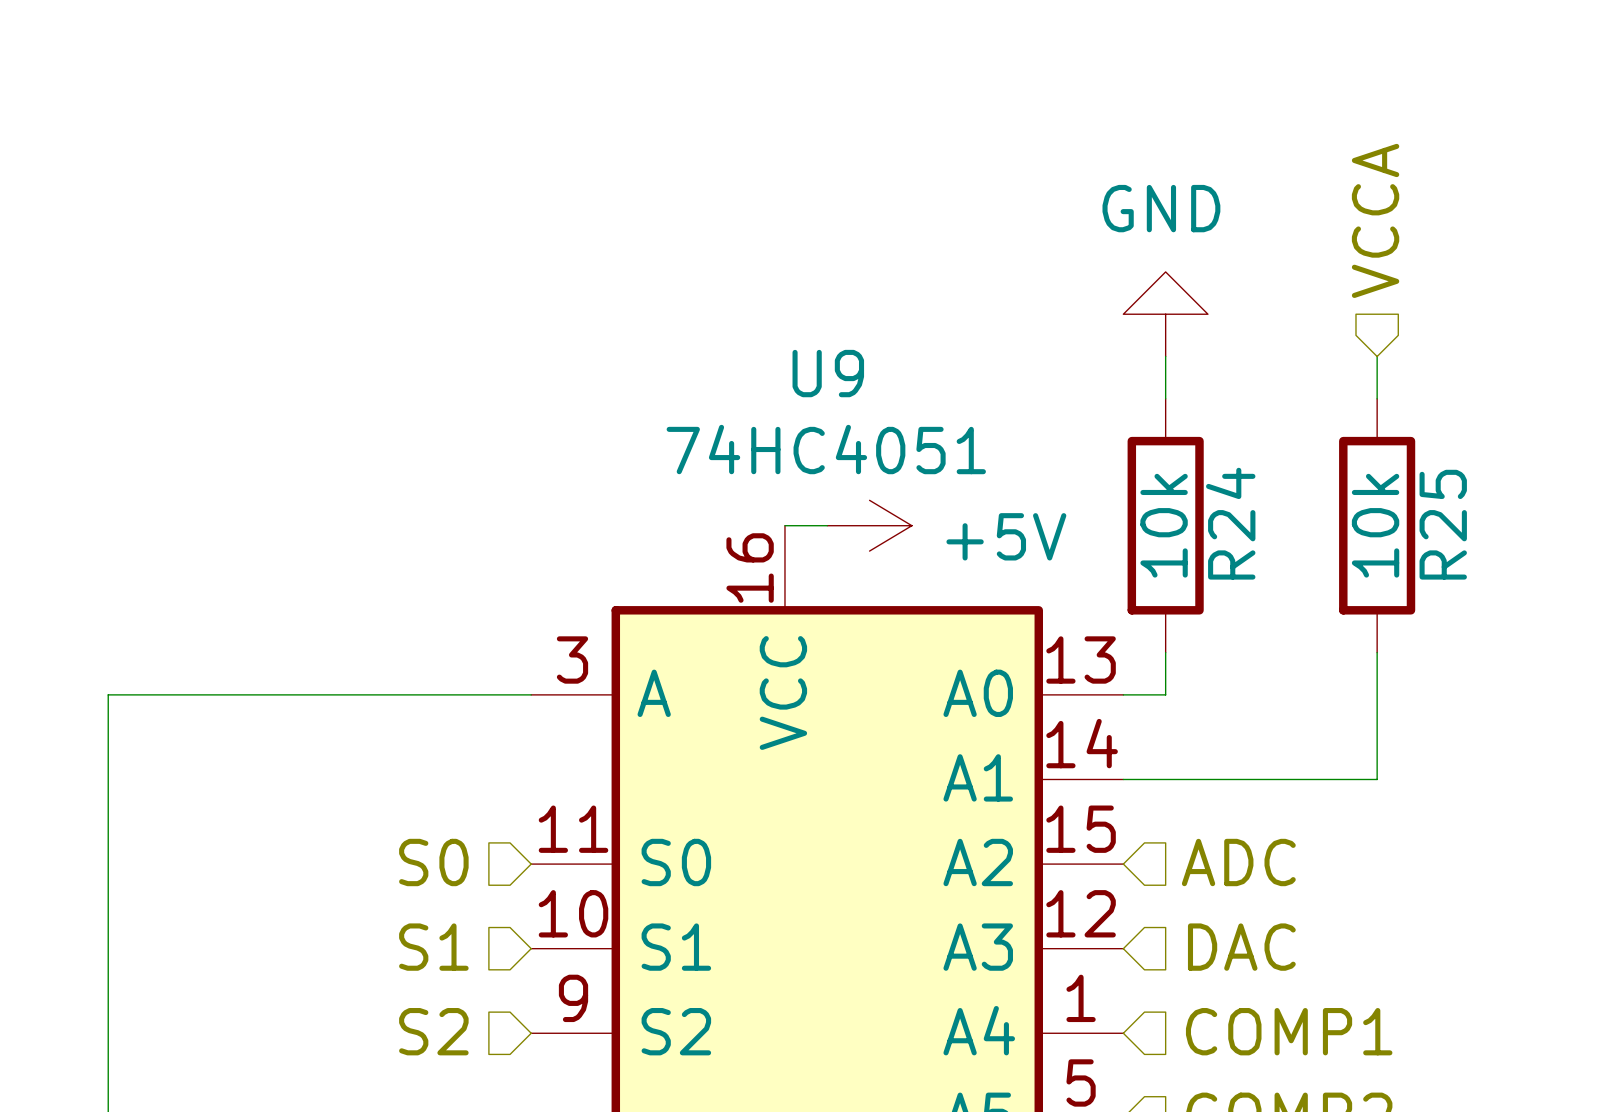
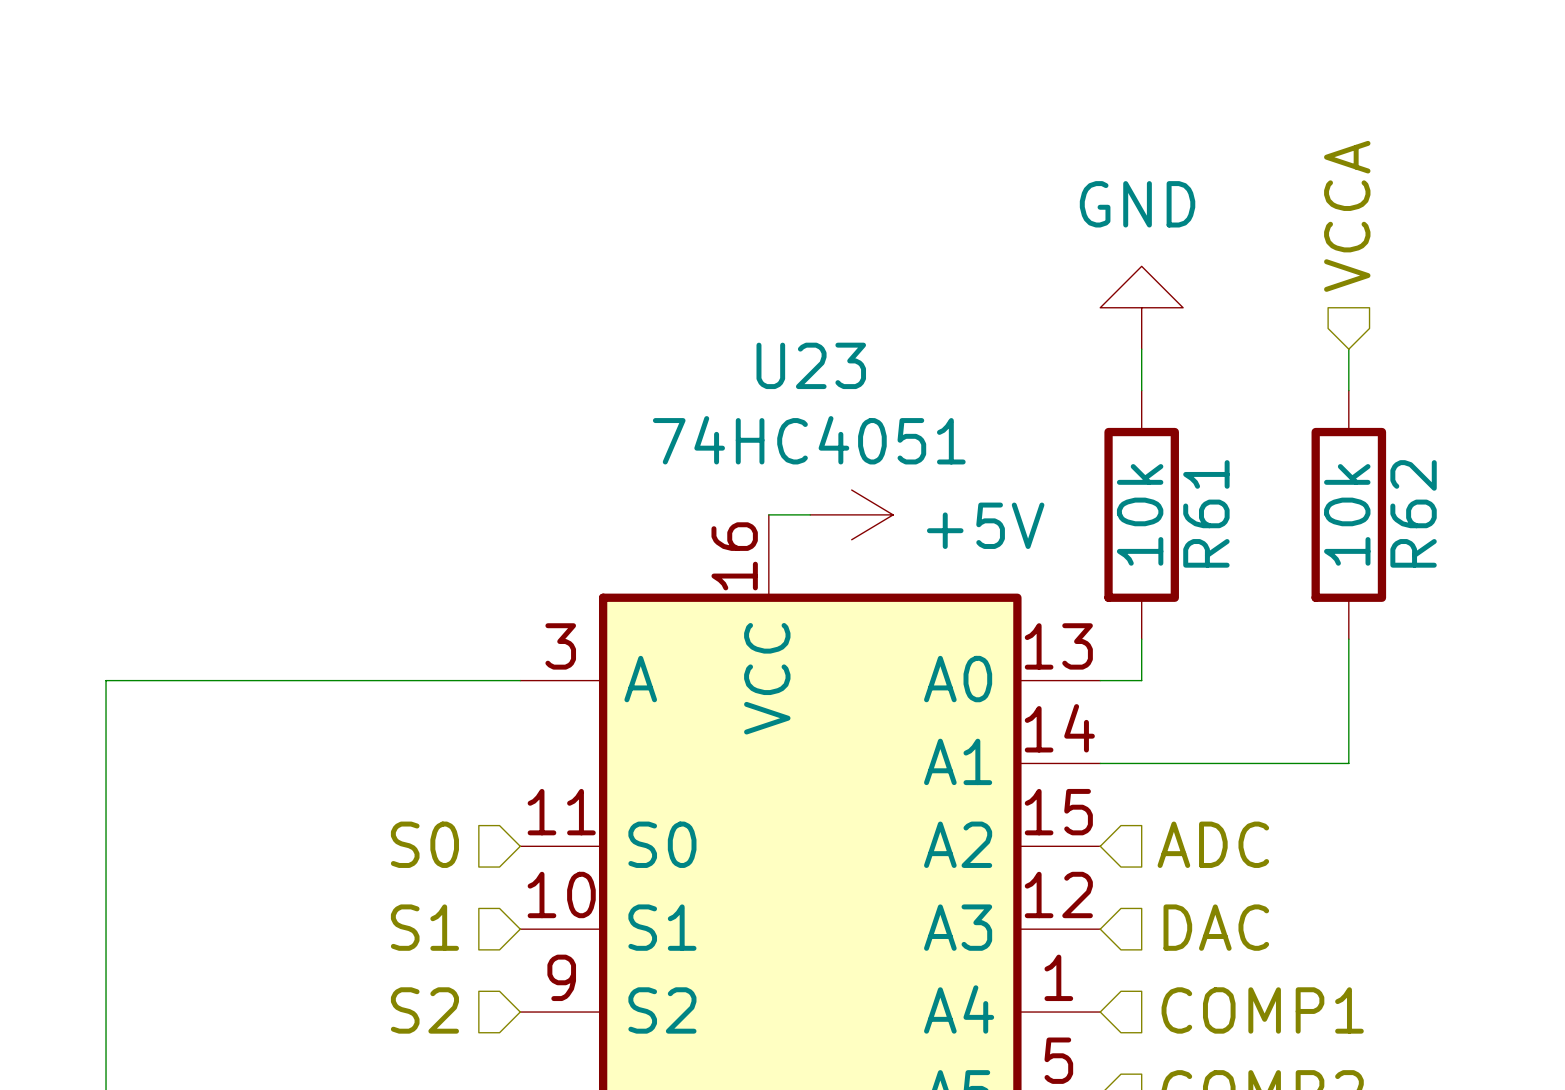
U9 name: U9 (828, 373) -> U23 (811, 365)
R24 name: R24 (1230, 523) -> R61 (1206, 513)
R25 name: R25 (1443, 524) -> R62 (1413, 513)

